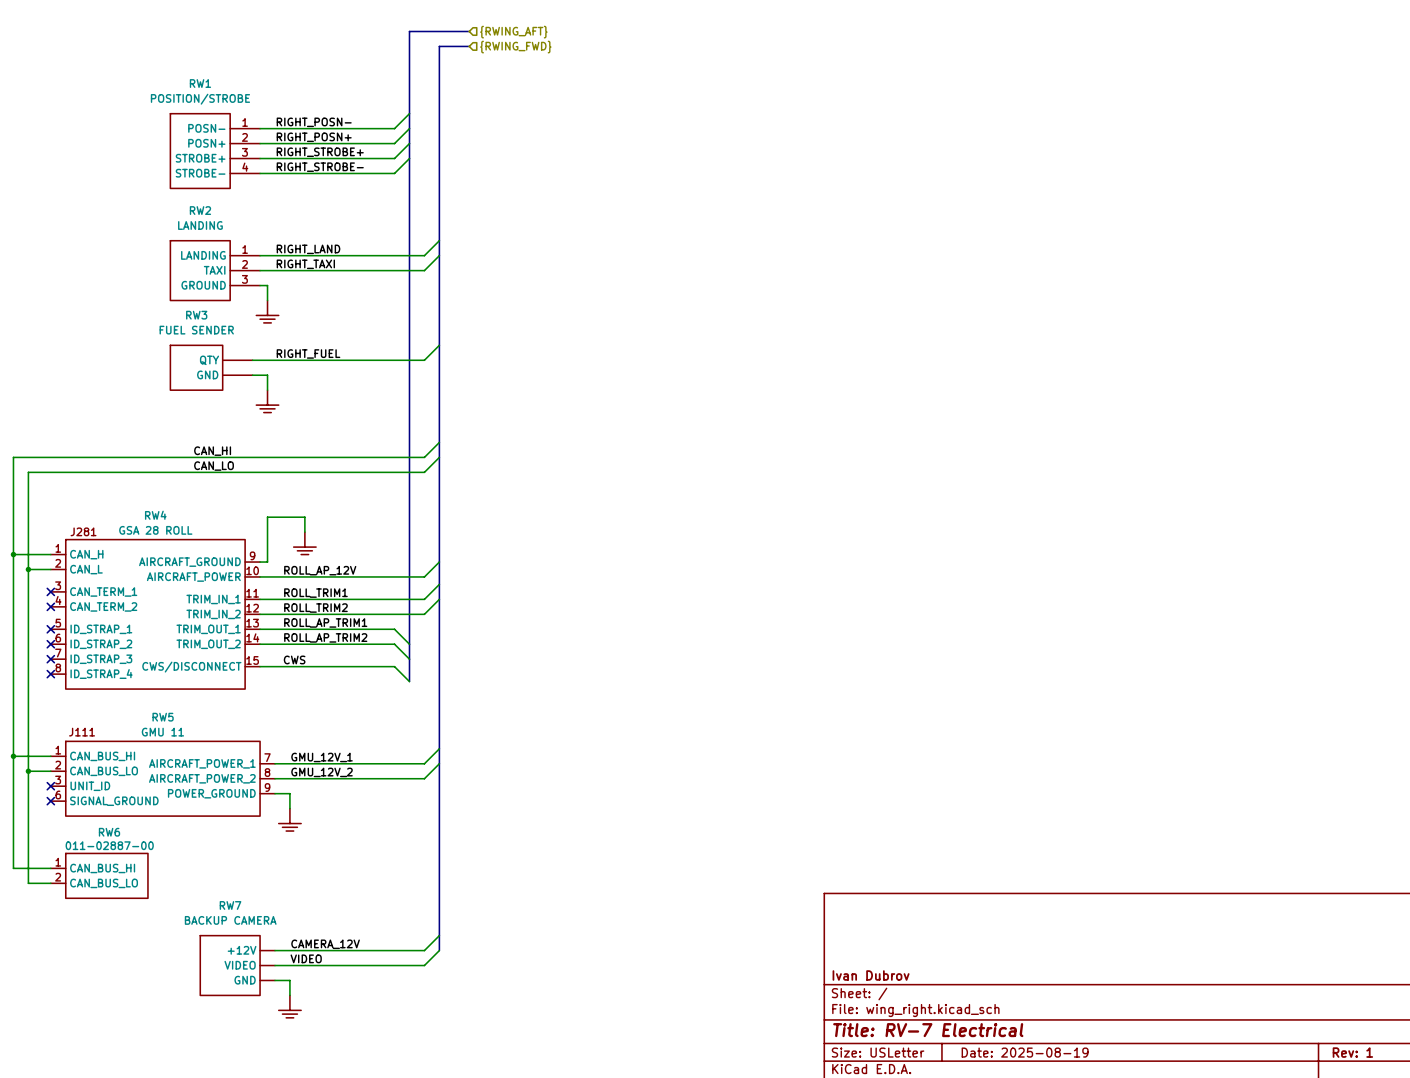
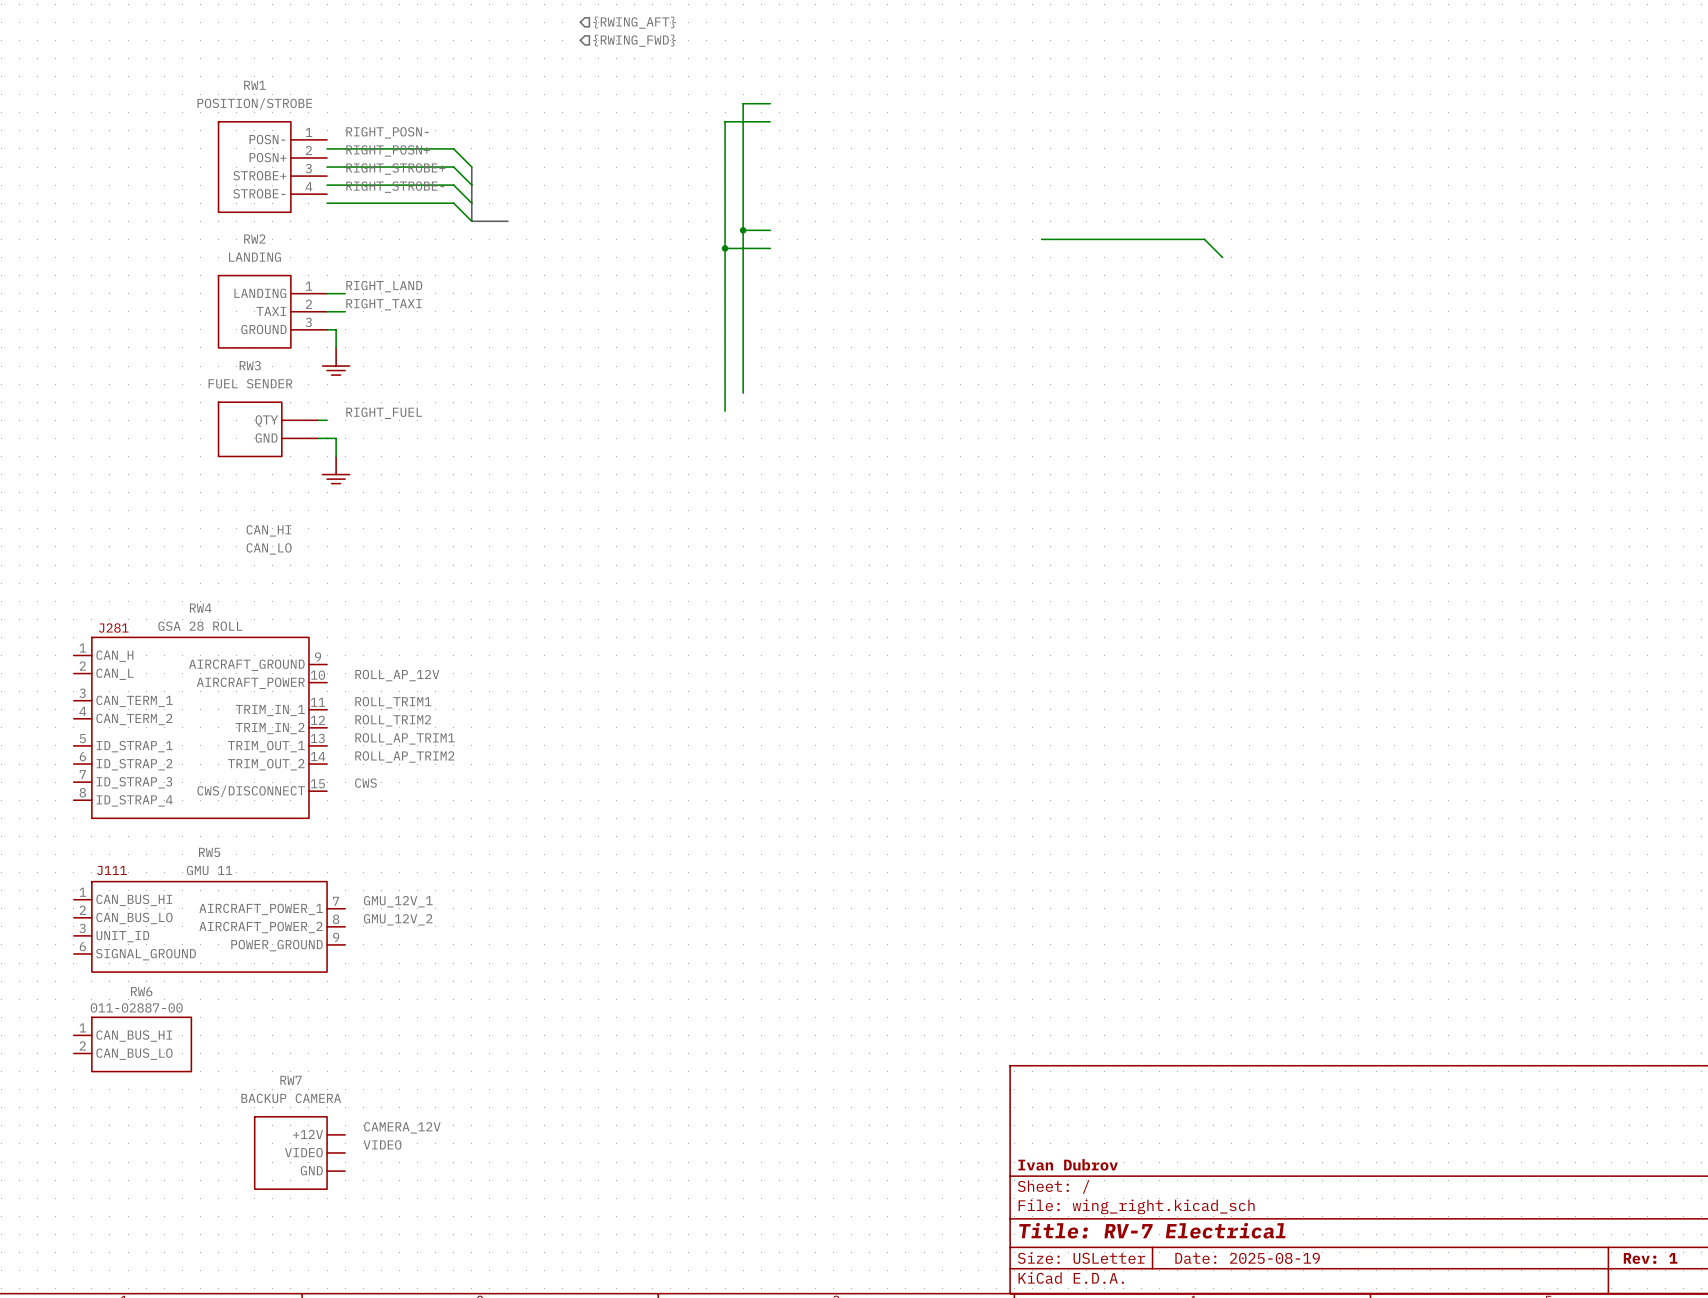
bus: (469, 31) (409, 31) (409, 681) -> none
bus: (469, 46) (439, 46) (439, 950) -> none
wire: none -> (770, 103) (743, 103) (743, 393)
wire: (409, 113) (394, 128) (260, 128) -> none
wire: none -> (770, 121) (725, 121) (725, 411)
wire: (409, 128) (394, 143) (260, 143) -> none
wire: none -> (327, 148) (453, 148) (471, 167)
wire: (409, 143) (394, 158) (260, 158) -> none
wire: none -> (327, 167) (453, 167) (471, 185)
bus: none -> (471, 167) (471, 221) (507, 221)
wire: (409, 158) (394, 173) (260, 173) -> none
wire: none -> (327, 185) (453, 185) (471, 203)
wire: none -> (327, 203) (453, 203) (471, 221)
wire: none -> (743, 230) (770, 230)
junction: none -> (743, 230)
wire: none -> (1041, 239) (1204, 239) (1222, 257)
wire: none -> (725, 248) (770, 248)
junction: none -> (725, 248)
wire: (439, 240) (424, 255) (274, 255) -> none
wire: (439, 255) (424, 270) (274, 270) -> none
wire: (439, 345) (424, 360) (260, 360) -> none
wire: (439, 442) (424, 457) (13, 457) (13, 868) (50, 868) -> none
wire: (439, 457) (424, 472) (28, 472) (28, 883) (50, 883) -> none
wire: (304, 532) (304, 517) (267, 517) (267, 562) (260, 562) -> none
power symbol: (304, 543) -> none
wire: (13, 554) (50, 554) -> none
junction: (13, 554) -> none
wire: (439, 562) (424, 576) (260, 576) -> none
wire: (28, 569) (50, 569) -> none
junction: (28, 569) -> none
wire: (439, 584) (424, 599) (260, 599) -> none
no-connect mark: (50, 591) -> none
wire: (439, 599) (424, 614) (260, 614) -> none
no-connect mark: (50, 606) -> none
no-connect mark: (50, 629) -> none
wire: (260, 629) (394, 629) (409, 644) -> none
no-connect mark: (50, 644) -> none
wire: (260, 644) (394, 644) (409, 659) -> none
no-connect mark: (50, 659) -> none
wire: (260, 666) (394, 666) (409, 681) -> none
no-connect mark: (50, 674) -> none
wire: (439, 748) (424, 763) (274, 763) -> none
wire: (13, 756) (50, 756) -> none
junction: (13, 756) -> none
wire: (439, 763) (424, 778) (274, 778) -> none
wire: (28, 771) (50, 771) -> none
junction: (28, 771) -> none
no-connect mark: (50, 786) -> none
wire: (274, 793) (289, 793) (289, 808) -> none
no-connect mark: (50, 801) -> none
power symbol: (289, 819) -> none
wire: (439, 935) (424, 950) (274, 950) -> none
wire: (439, 950) (424, 965) (274, 965) -> none
wire: (274, 980) (289, 980) (289, 995) -> none
power symbol: (289, 1006) -> none

